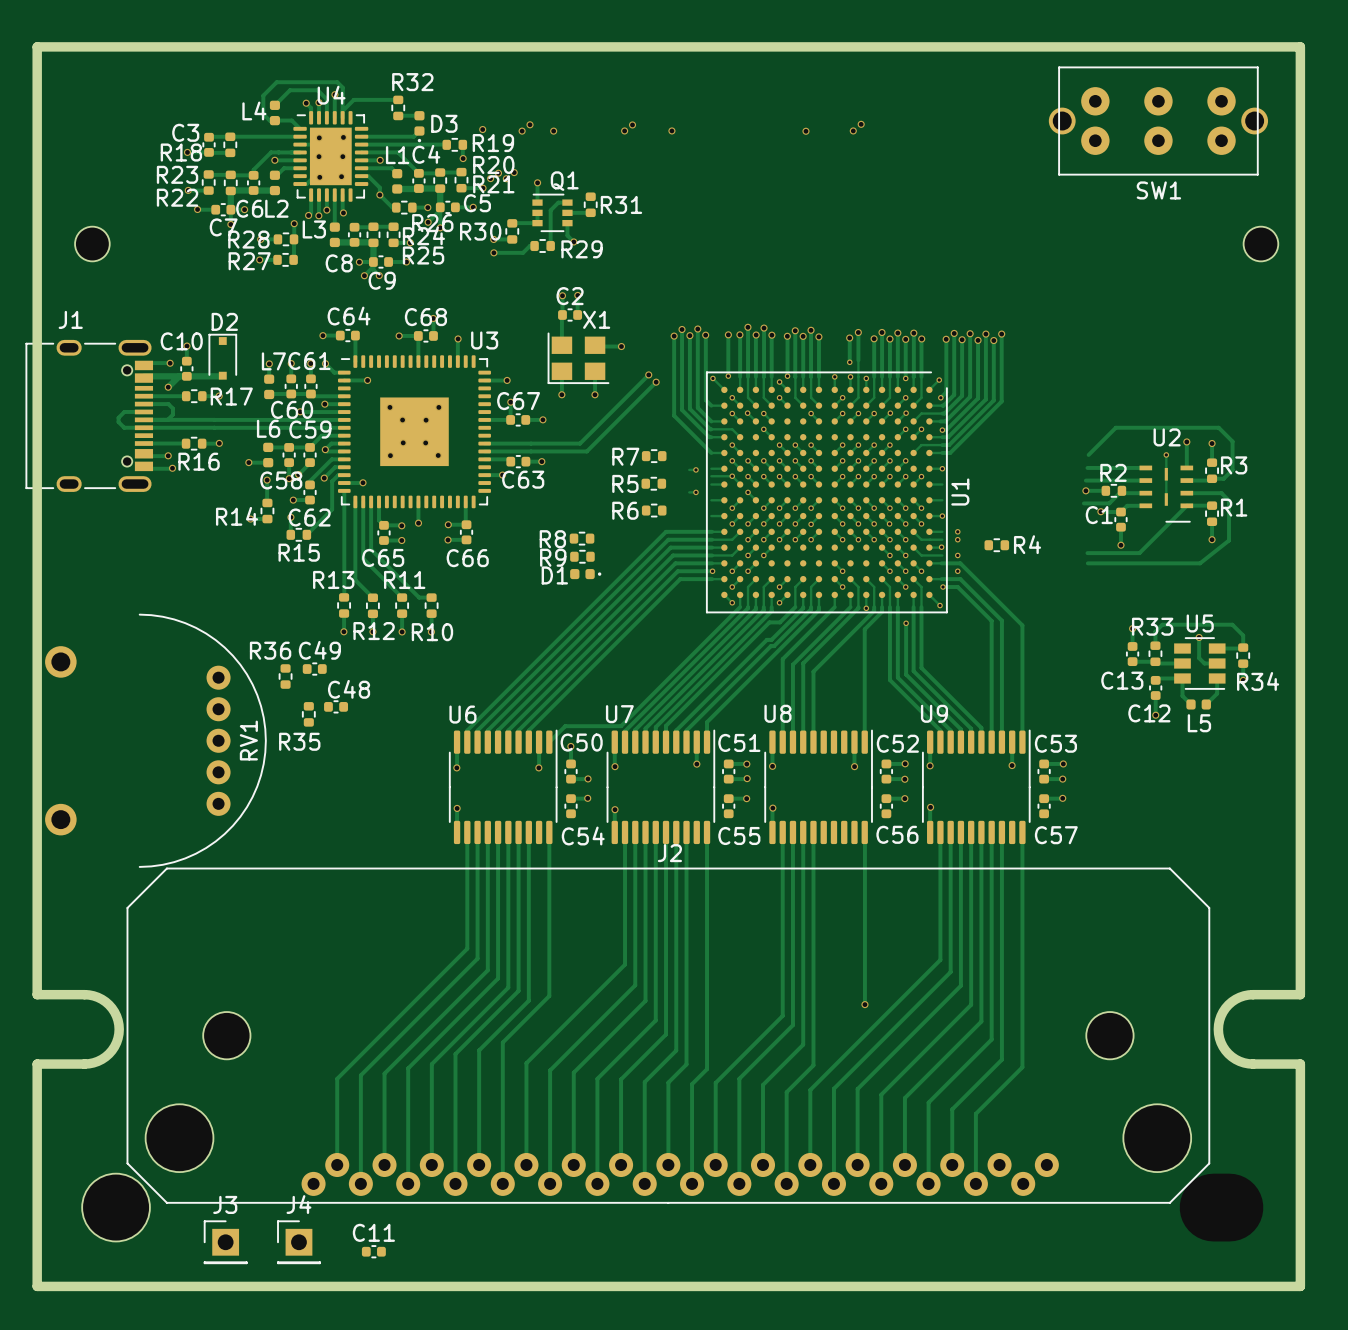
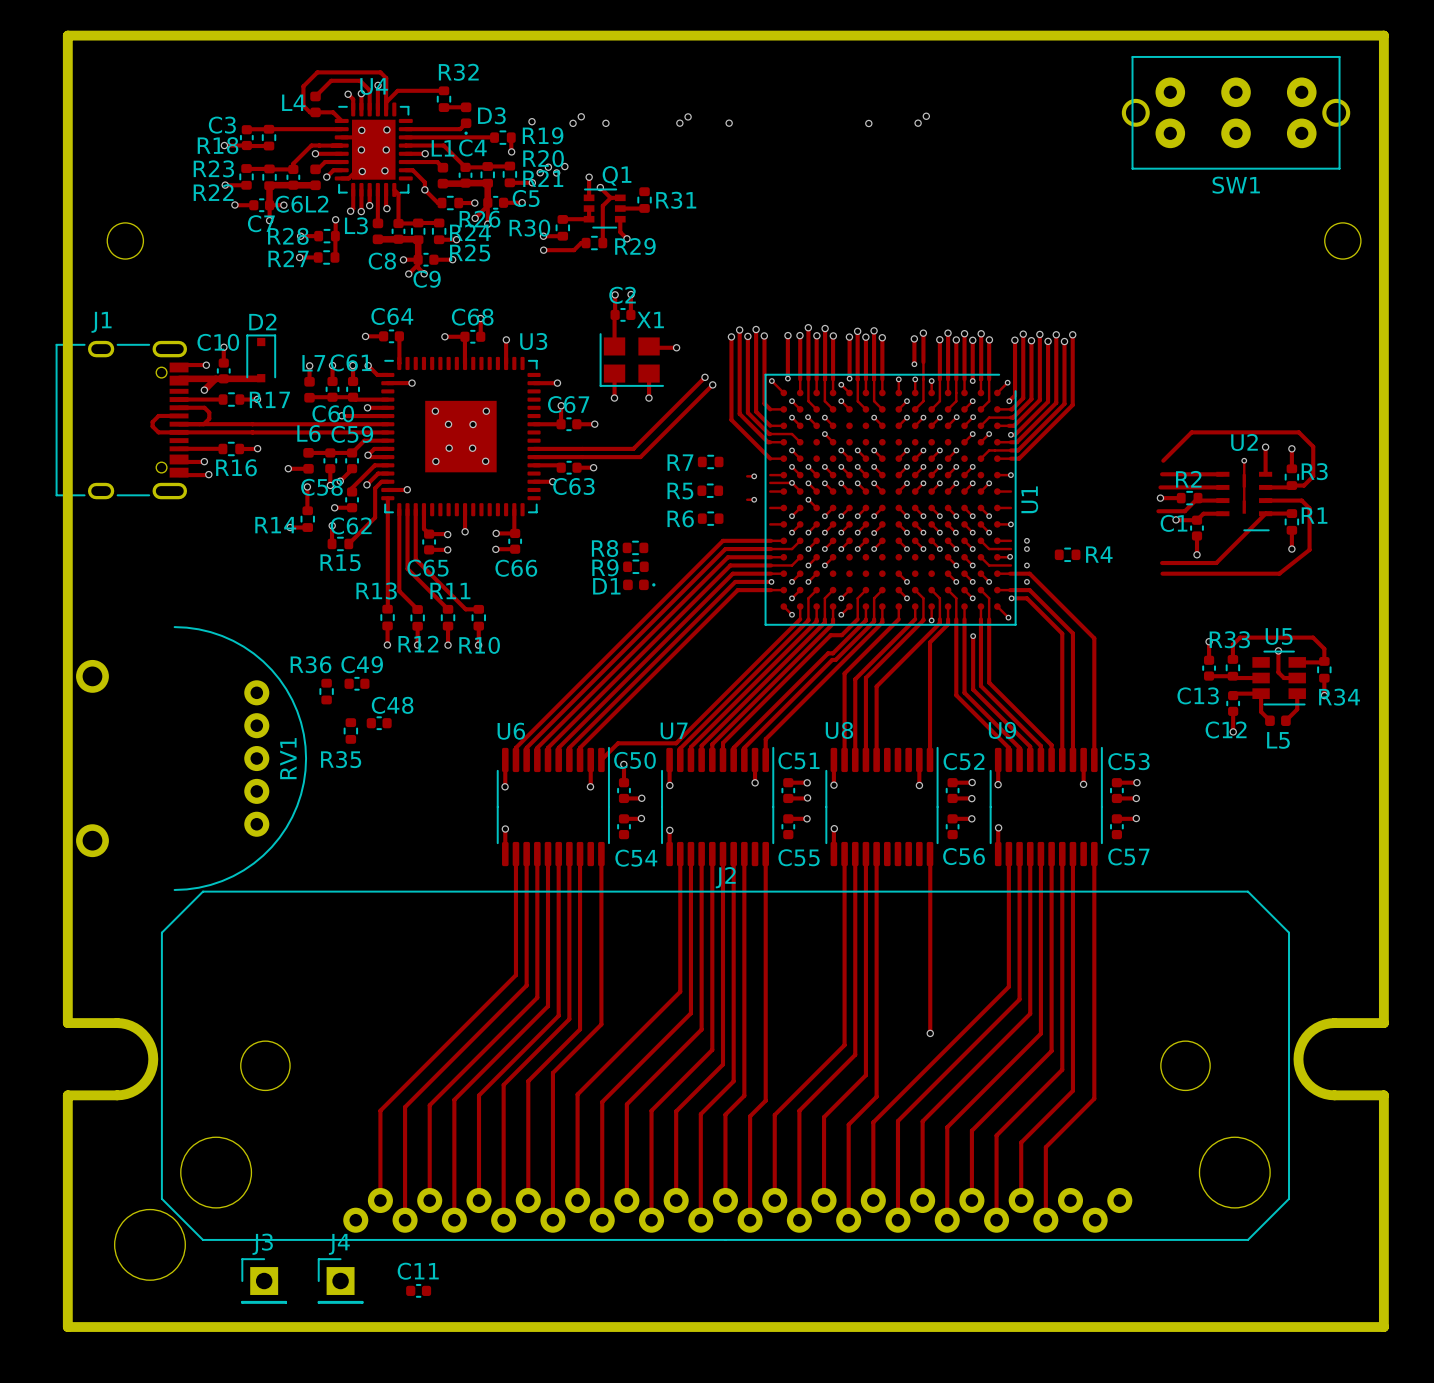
track: none -> (341, 170) (333, 170) (326, 177)
via: none -> (326, 177)
track: none -> (600, 187) (610, 197)
via: none -> (600, 187)
track: none -> (394, 189) (398, 194) (398, 223)

